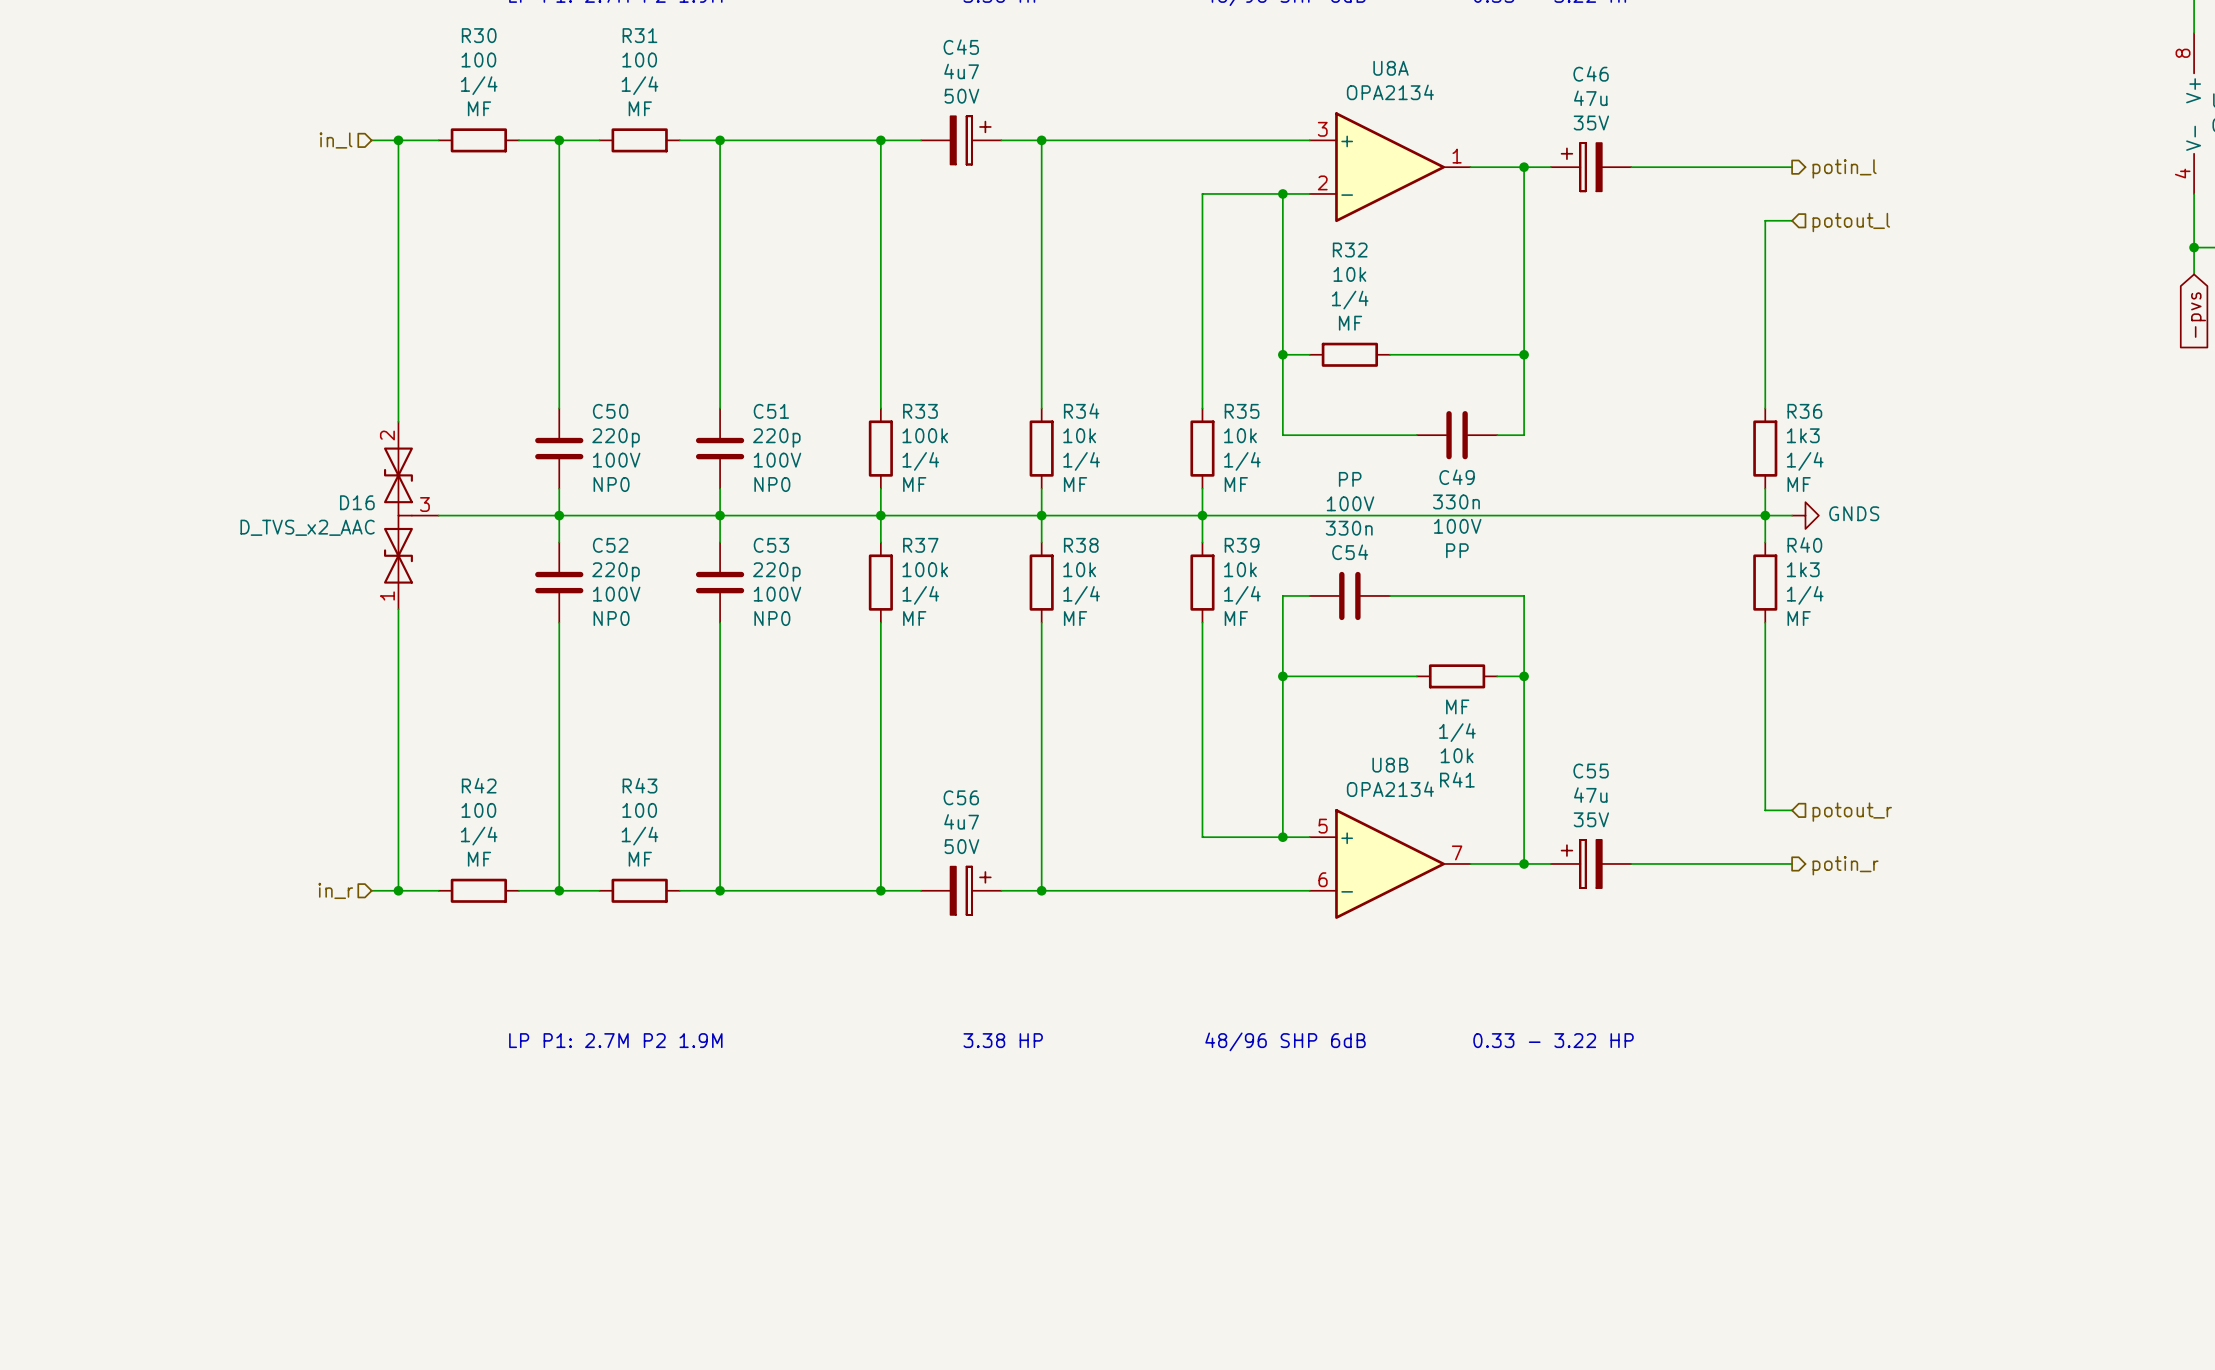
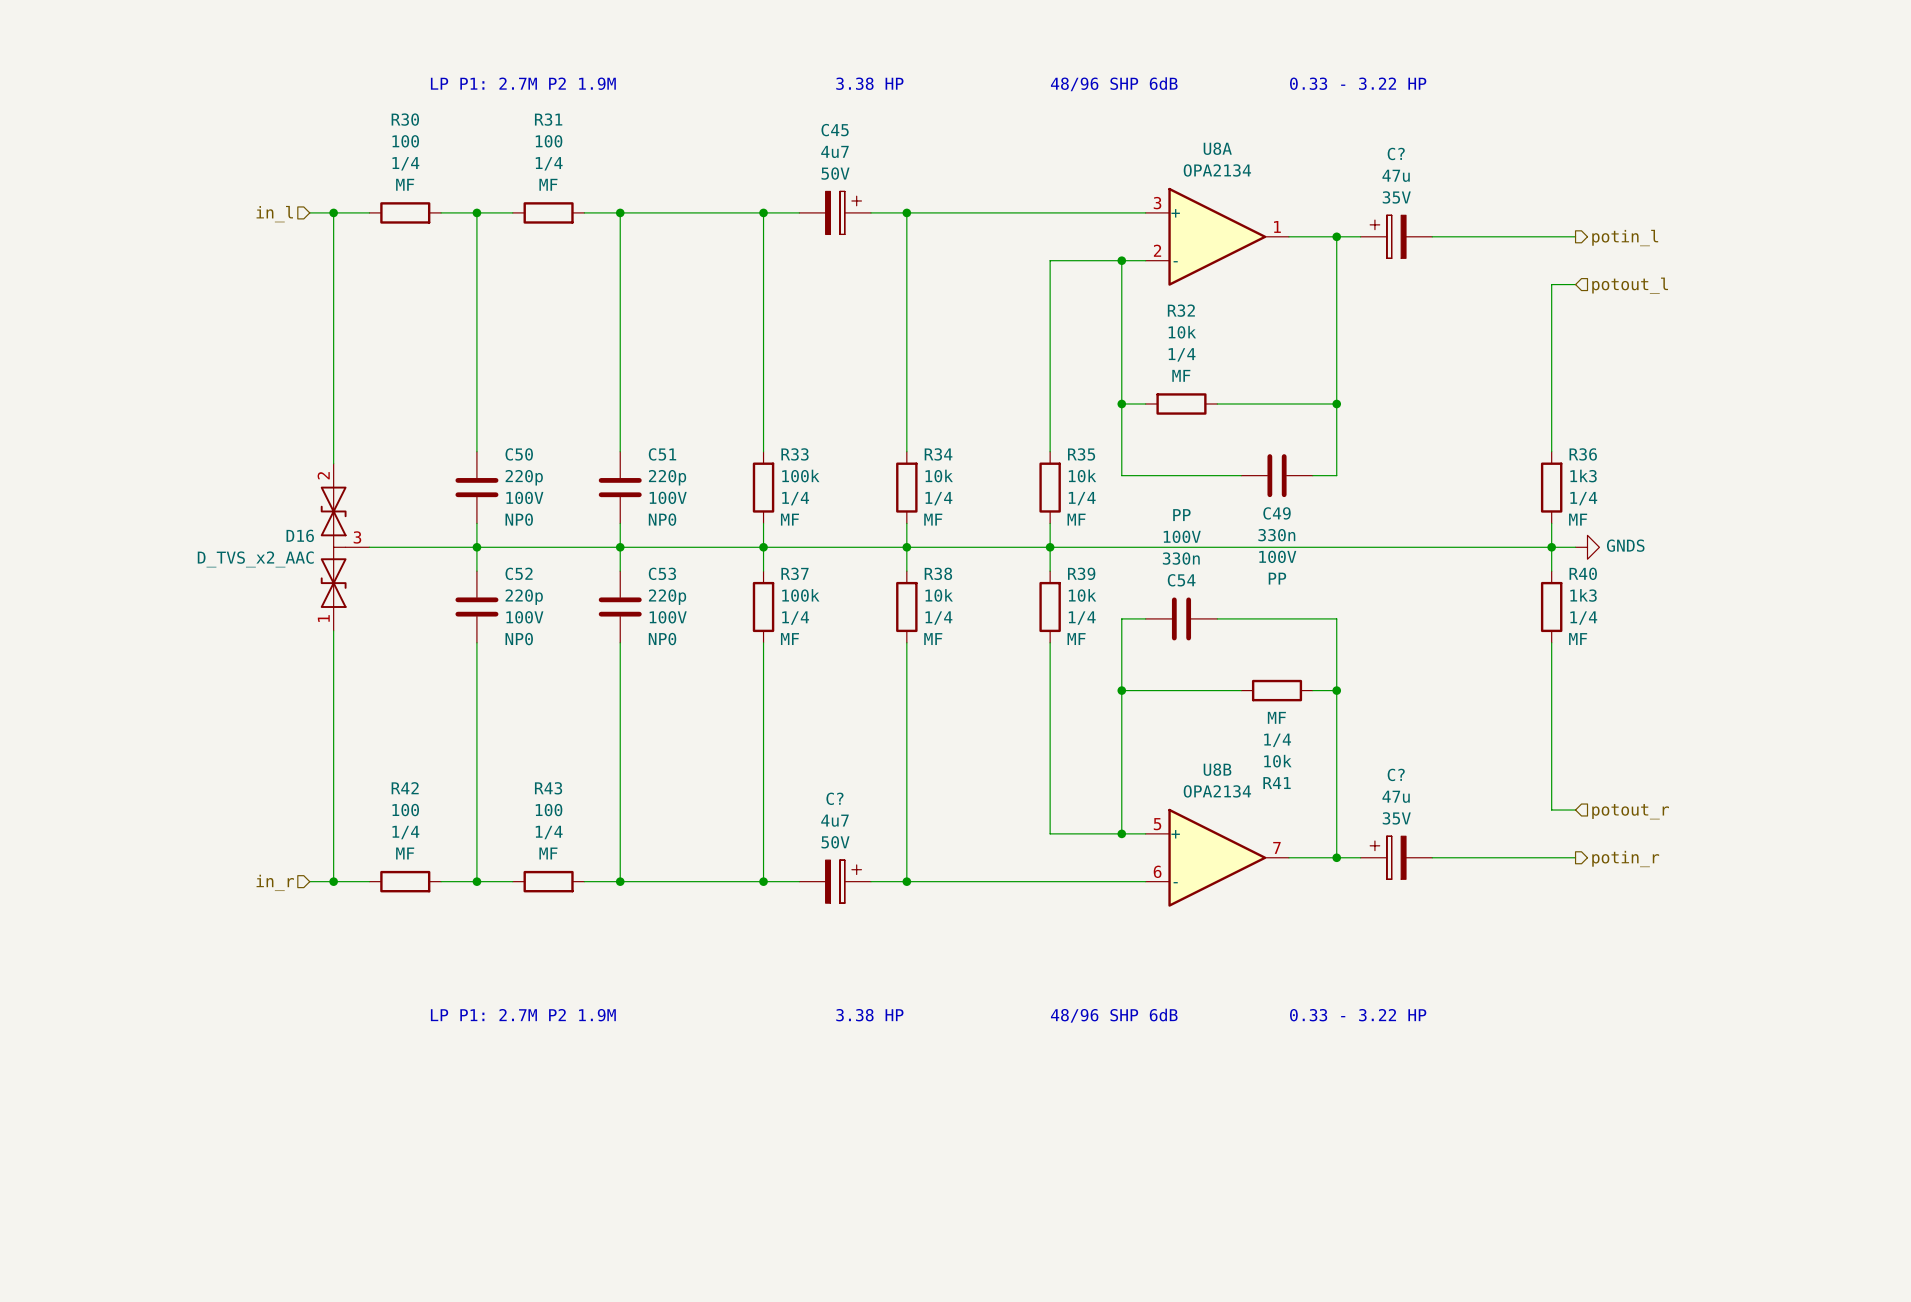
C46 name: C46 (1591, 73) -> C? (1396, 153)
C55 name: C55 (1591, 771) -> C? (1396, 774)
C56 name: C56 (961, 797) -> C? (834, 798)

